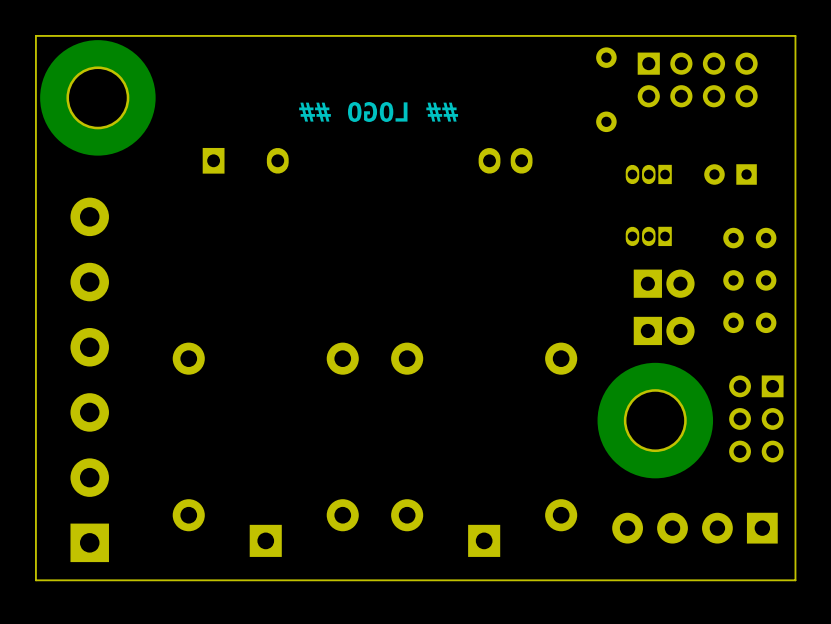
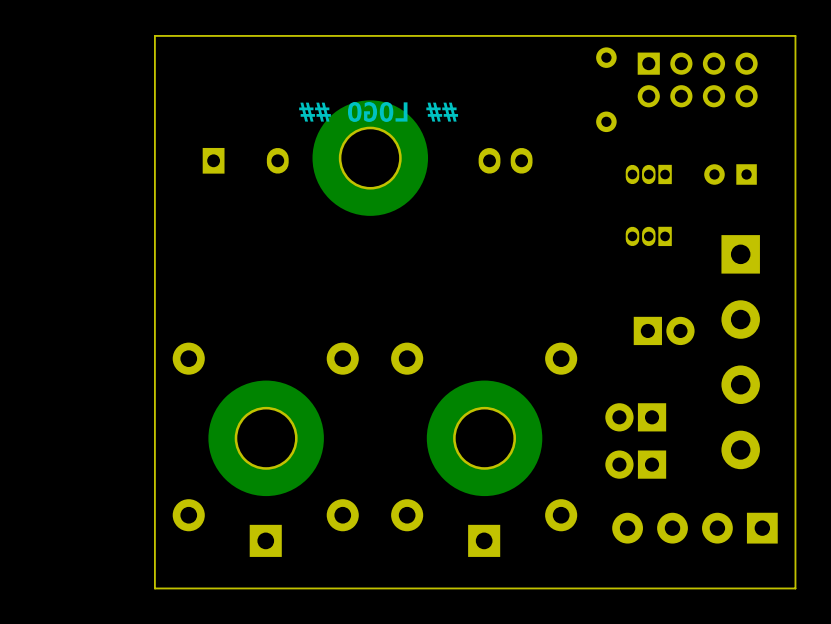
board edge: (154, 35) (35, 35) (35, 580) (795, 580) -> (154, 35) (154, 588) (795, 588) (795, 580)
part: (97, 97) -> none
part: none -> (370, 158)
part: (749, 238) -> none
part: (749, 280) -> none
part: (664, 283) -> none
part: (749, 322) -> none
part: none -> (740, 352)
part: (89, 379) -> none
part: none -> (635, 417)
part: (756, 418) -> none
part position: (655, 420) -> (484, 438)
part: none -> (266, 438)
part: none -> (635, 464)

